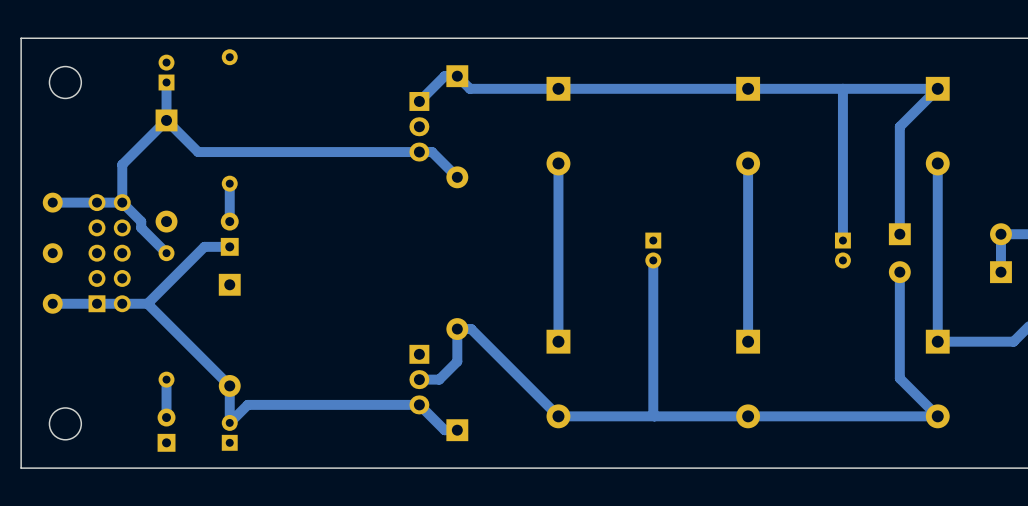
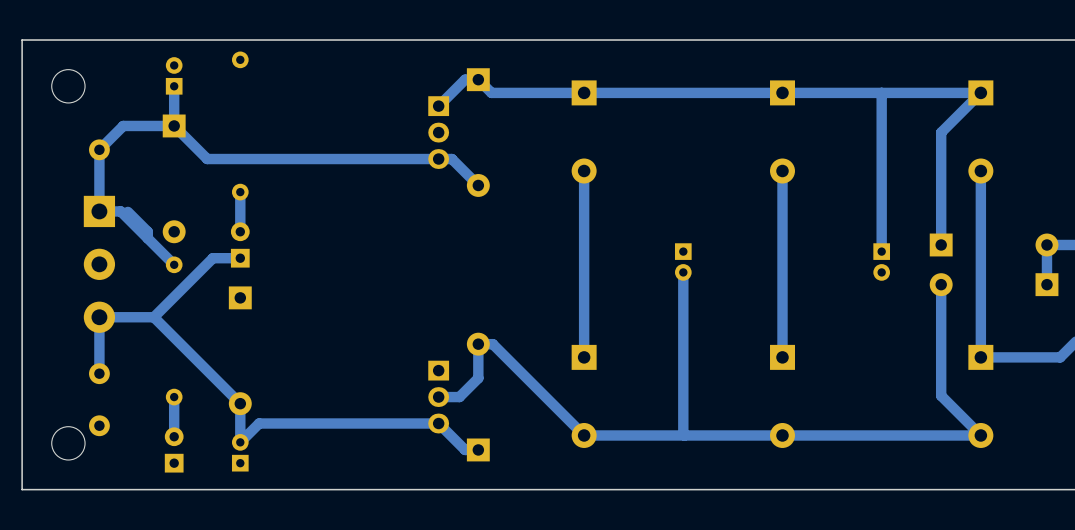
track: (166, 120) (122, 164) (122, 202) (52, 202) -> (174, 125) (123, 125) (99, 149) (99, 211) (120, 211) (147, 238)
part: none -> (99, 149)
part: (52, 202) -> none
track: (204, 246) (147, 303) (52, 303) -> (213, 258) (153, 317) (99, 317) (99, 373)
part: none -> (99, 264)
part: (52, 253) -> none
part: (109, 253) -> none
part: (52, 303) -> none
part: none -> (99, 373)
part: none -> (99, 425)

